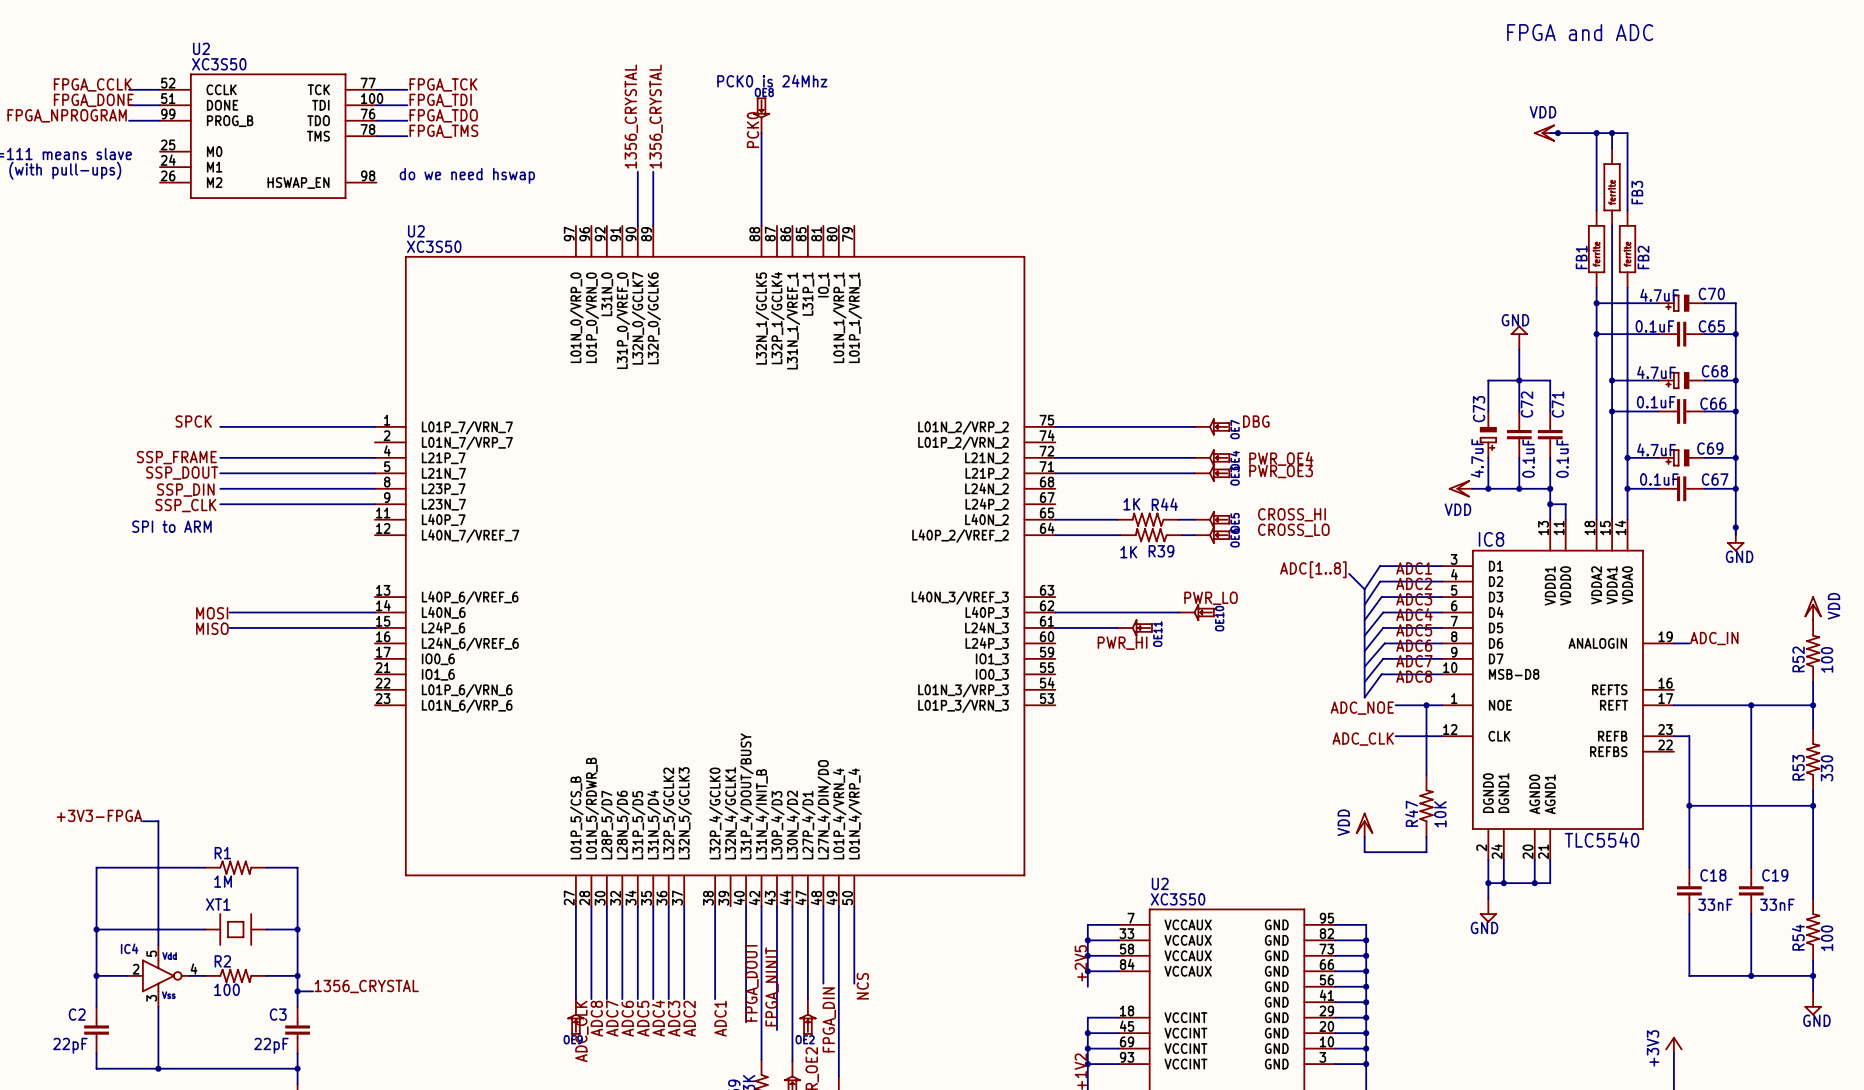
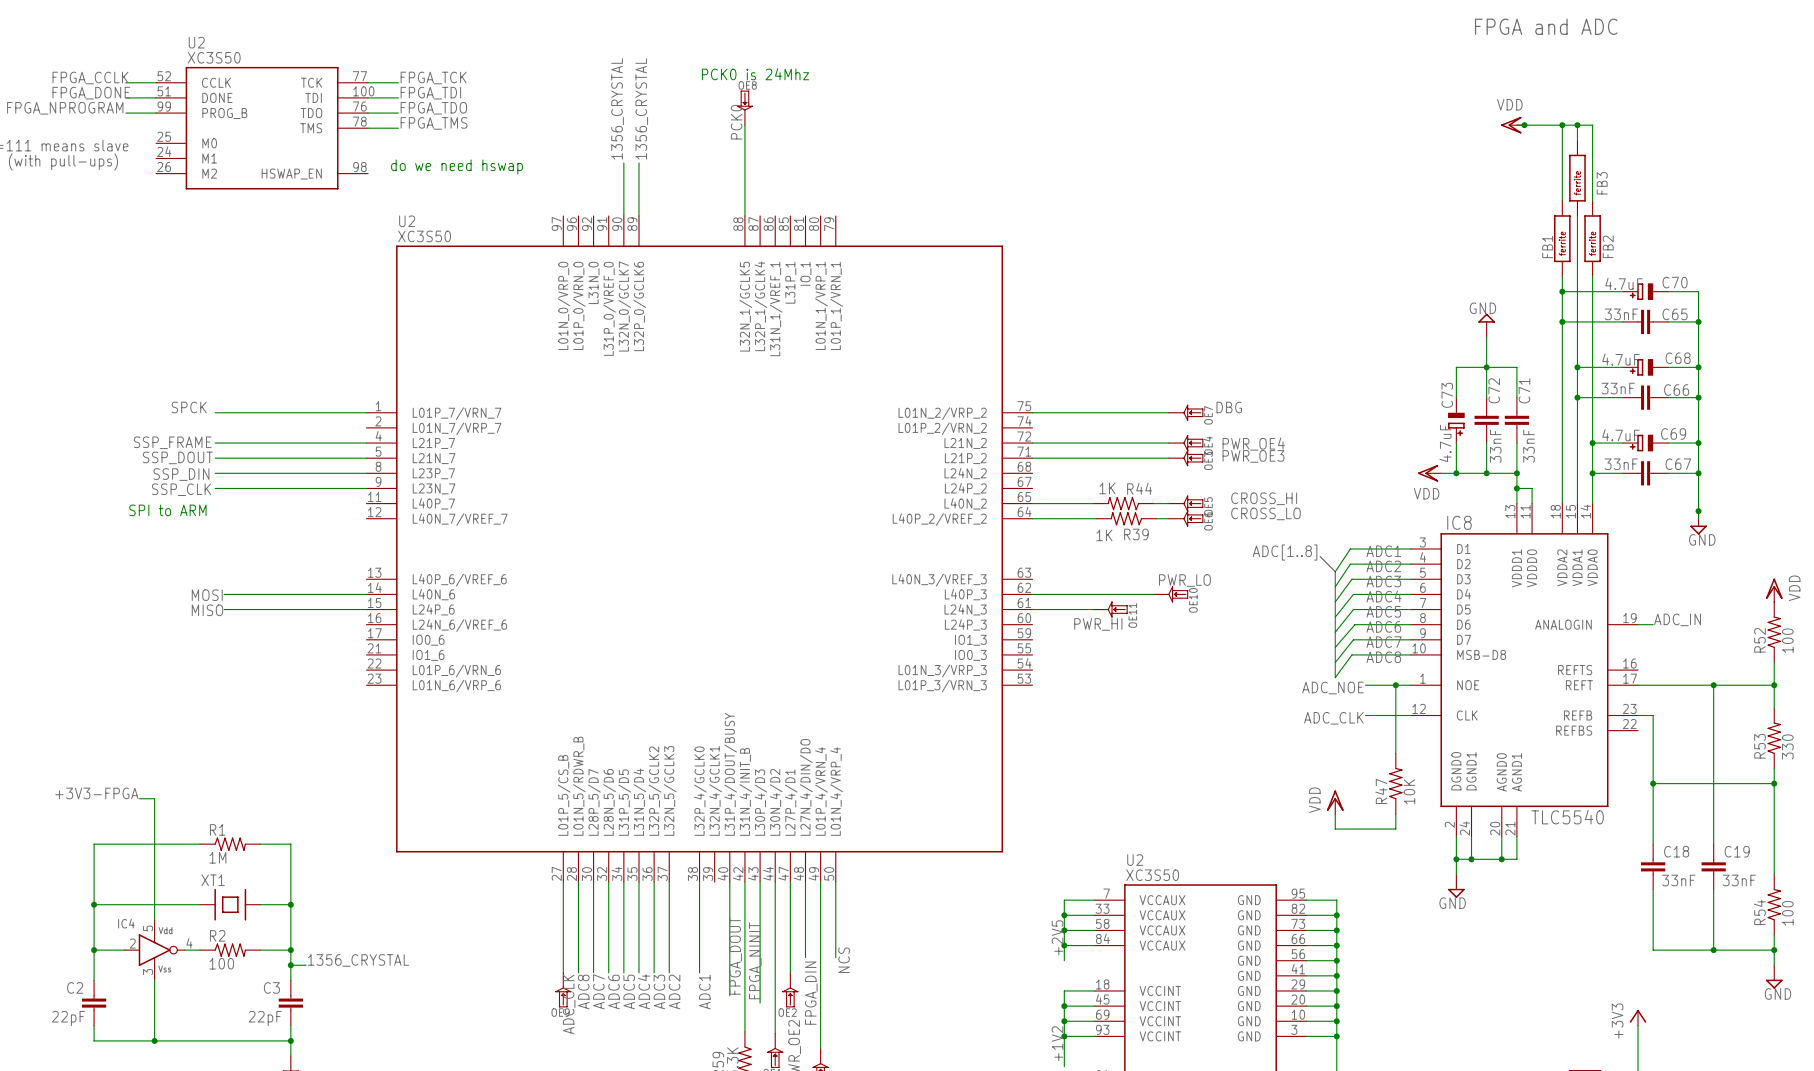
C65 value: 0.1uF (1654, 326) -> 33nF (1621, 314)
C66 value: 0.1uF (1656, 402) -> 33nF (1618, 388)
C72 value: 0.1uF (1528, 458) -> 33nF (1495, 446)
C71 value: 0.1uF (1562, 458) -> 33nF (1529, 446)
C67 value: 0.1uF (1659, 479) -> 33nF (1621, 464)

